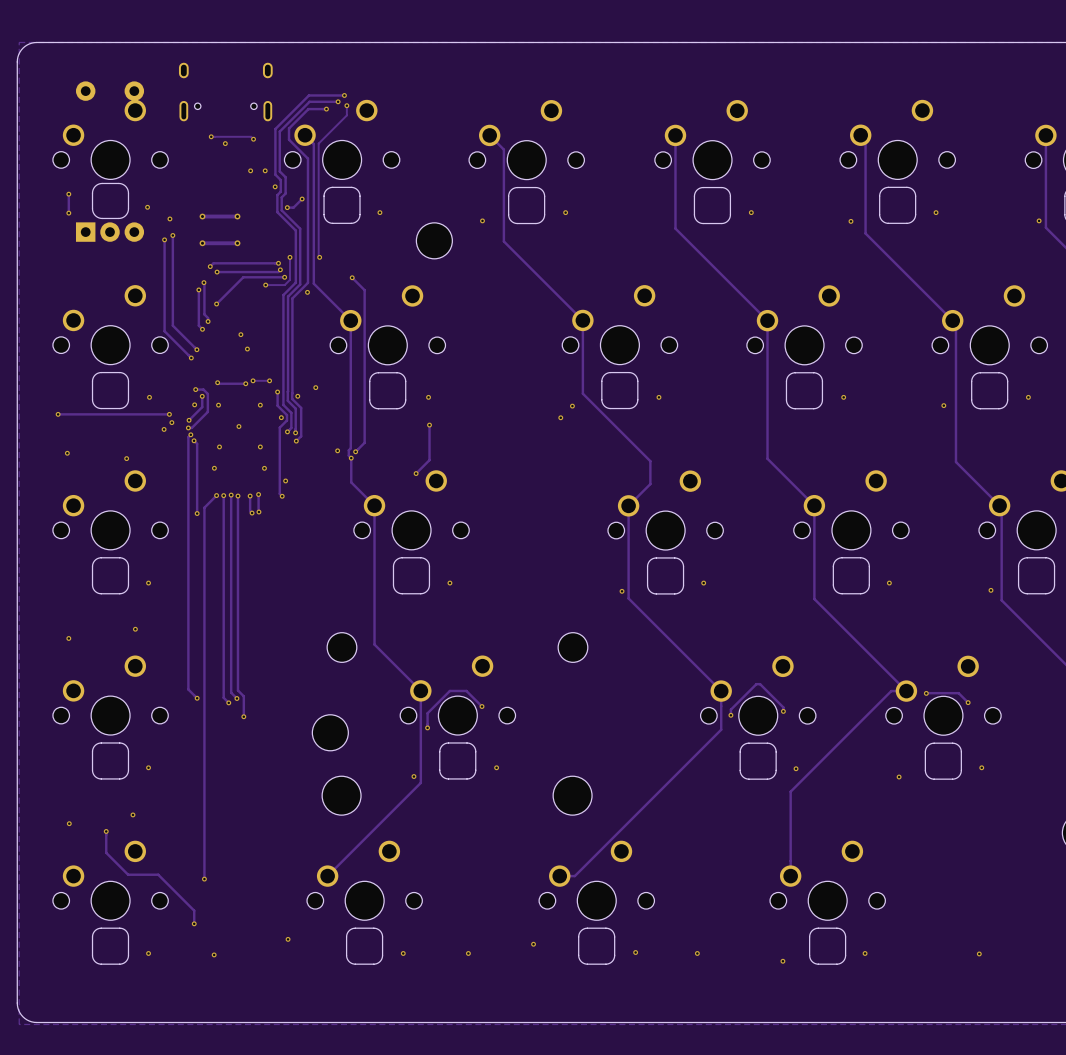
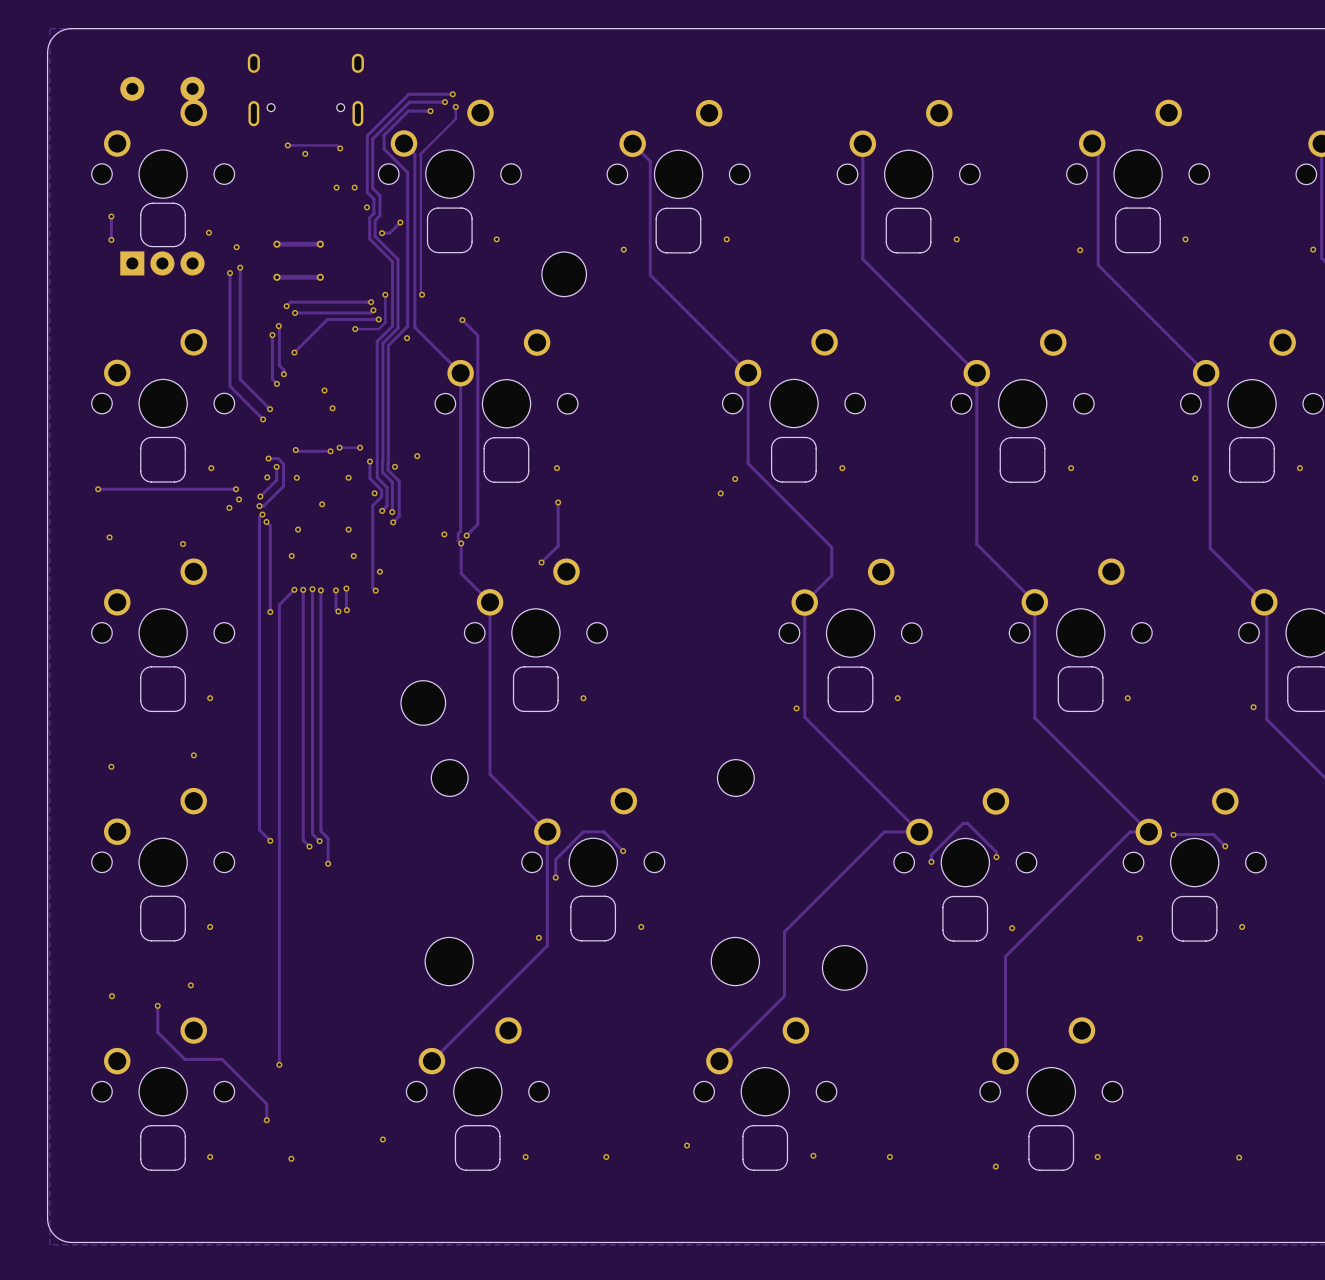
track: (721, 691) (721, 729) (574, 876) (559, 876) -> (919, 831) (884, 831) (784, 931) (784, 996) (719, 1061)
part position: (330, 732) -> (423, 702)
part: none -> (844, 967)

